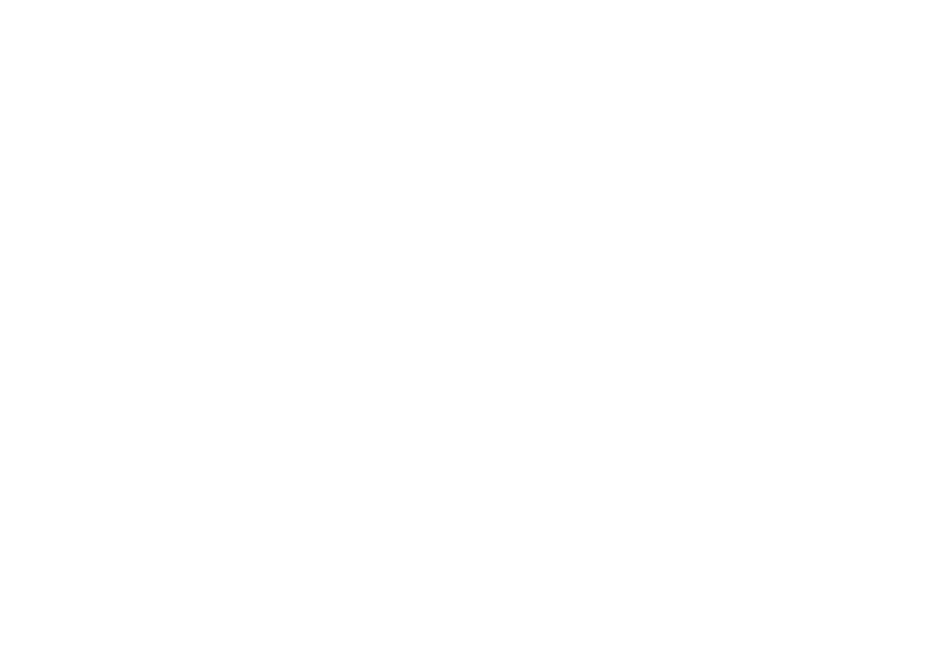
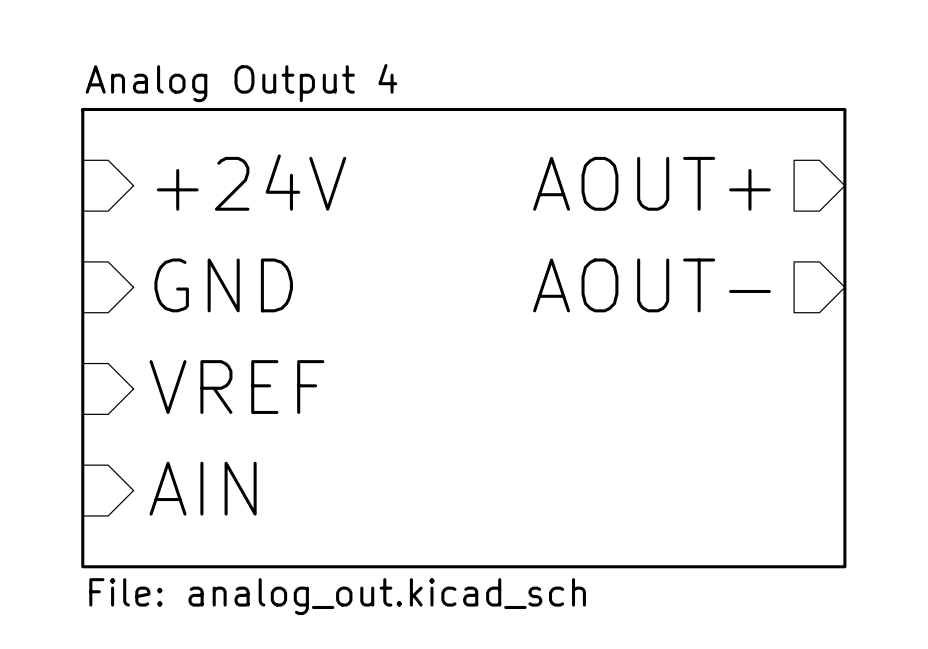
sheet pin: none -> +24V (251, 182)
sheet pin: none -> AOUT+ (651, 183)
sheet pin: none -> GND (223, 285)
sheet pin: none -> AOUT- (651, 285)
sheet Analog Output 4: none -> File: analog_out.kicad_sch (463, 338)
sheet pin: none -> VREF (236, 387)
sheet pin: none -> AIN (203, 488)

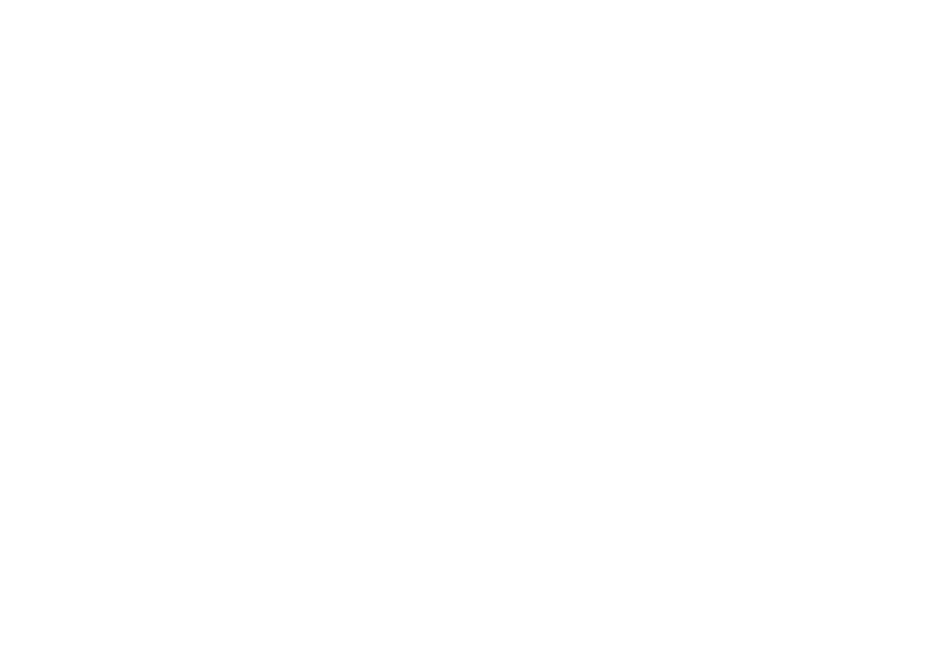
sheet pin: +24V (251, 182) -> none
sheet pin: AOUT+ (651, 183) -> none
sheet pin: GND (223, 285) -> none
sheet pin: AOUT- (651, 285) -> none
sheet Analog Output 4: File: analog_out.kicad_sch (463, 338) -> none
sheet pin: VREF (236, 387) -> none
sheet pin: AIN (203, 488) -> none

